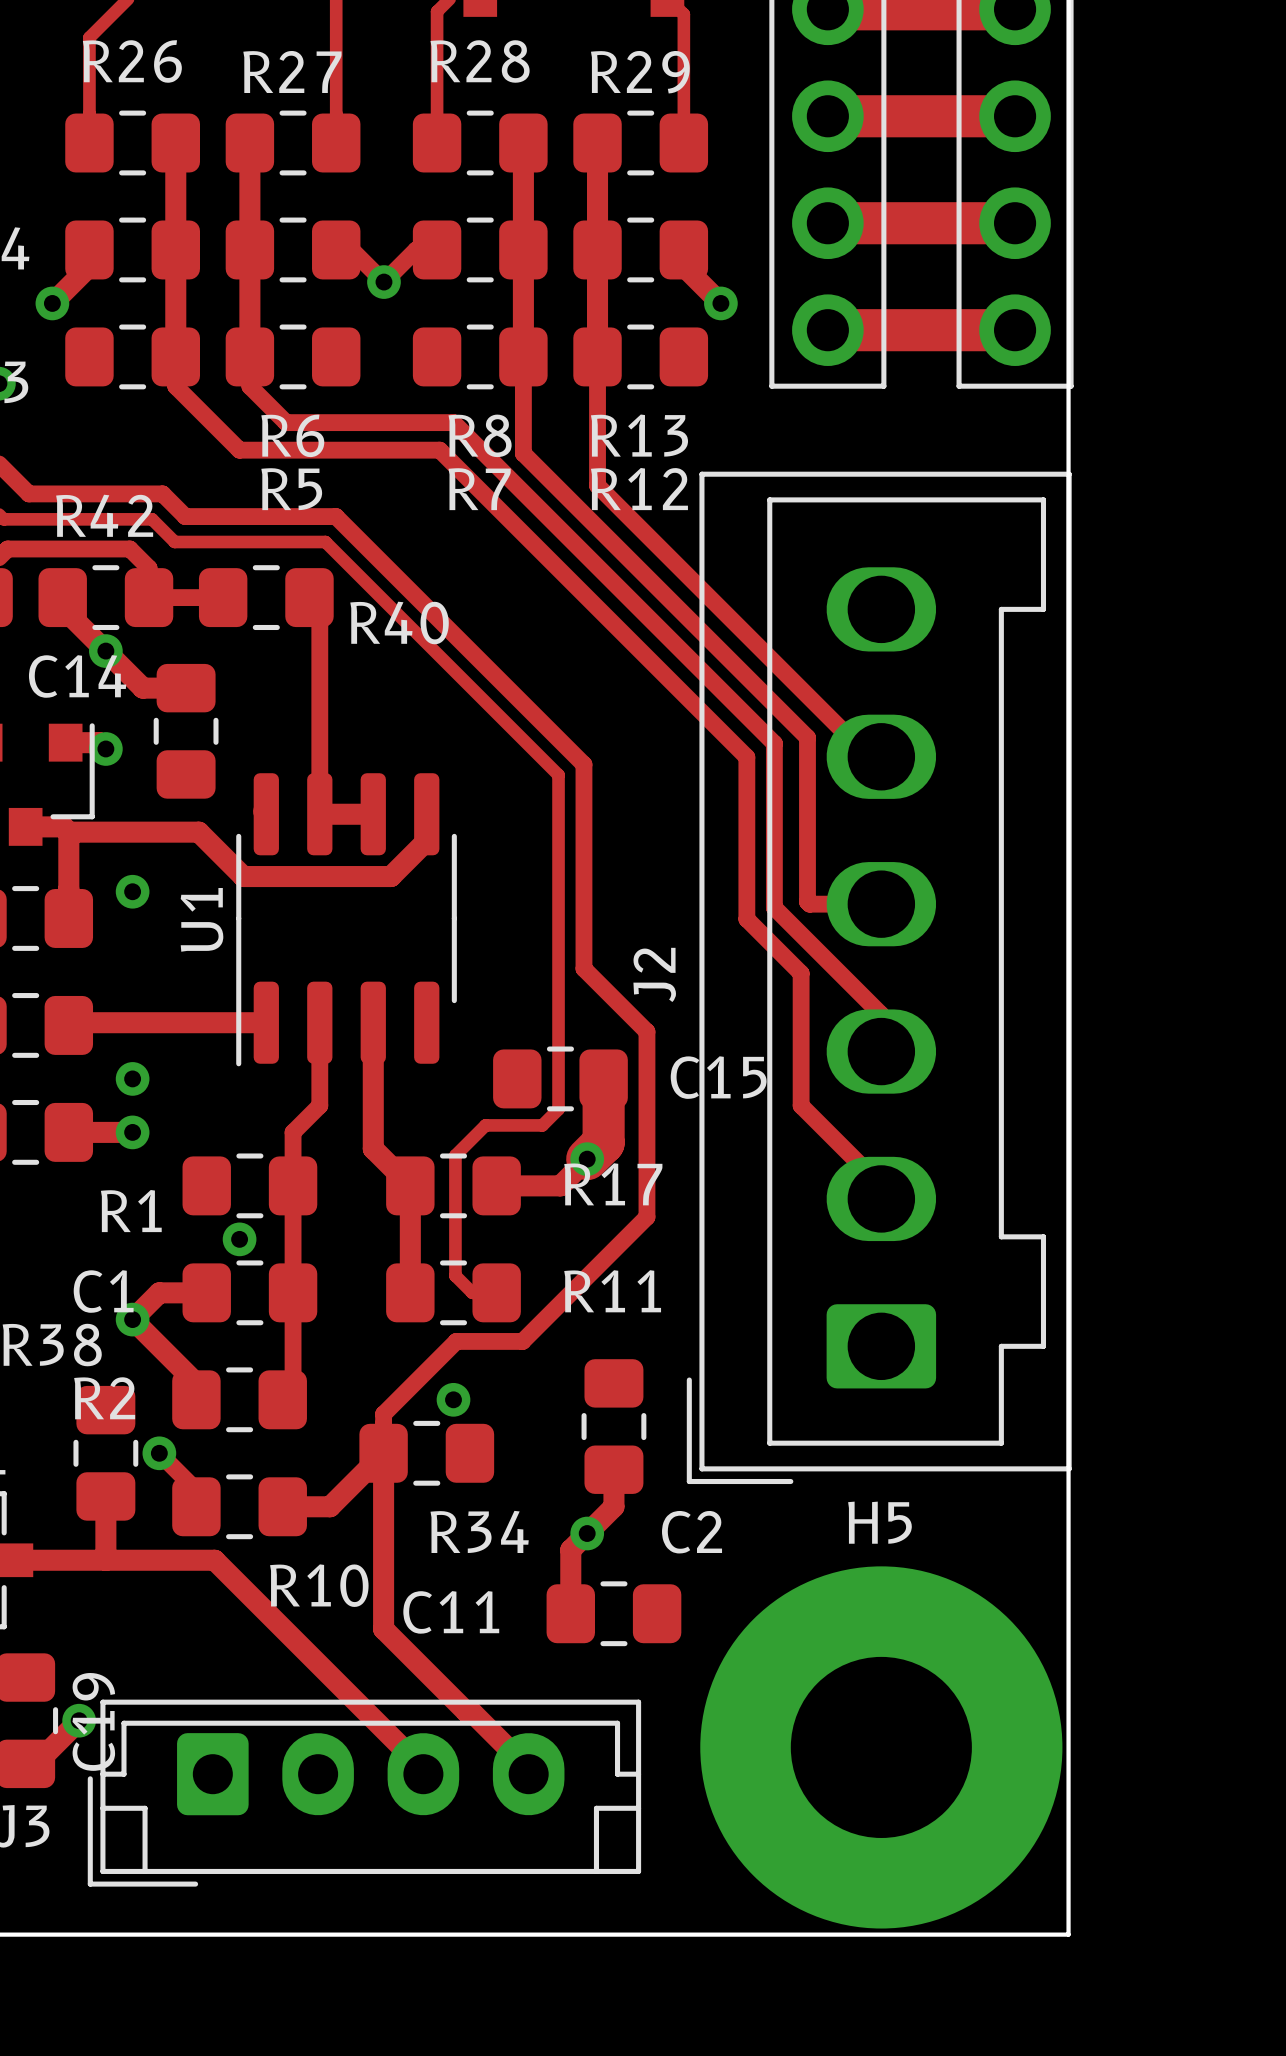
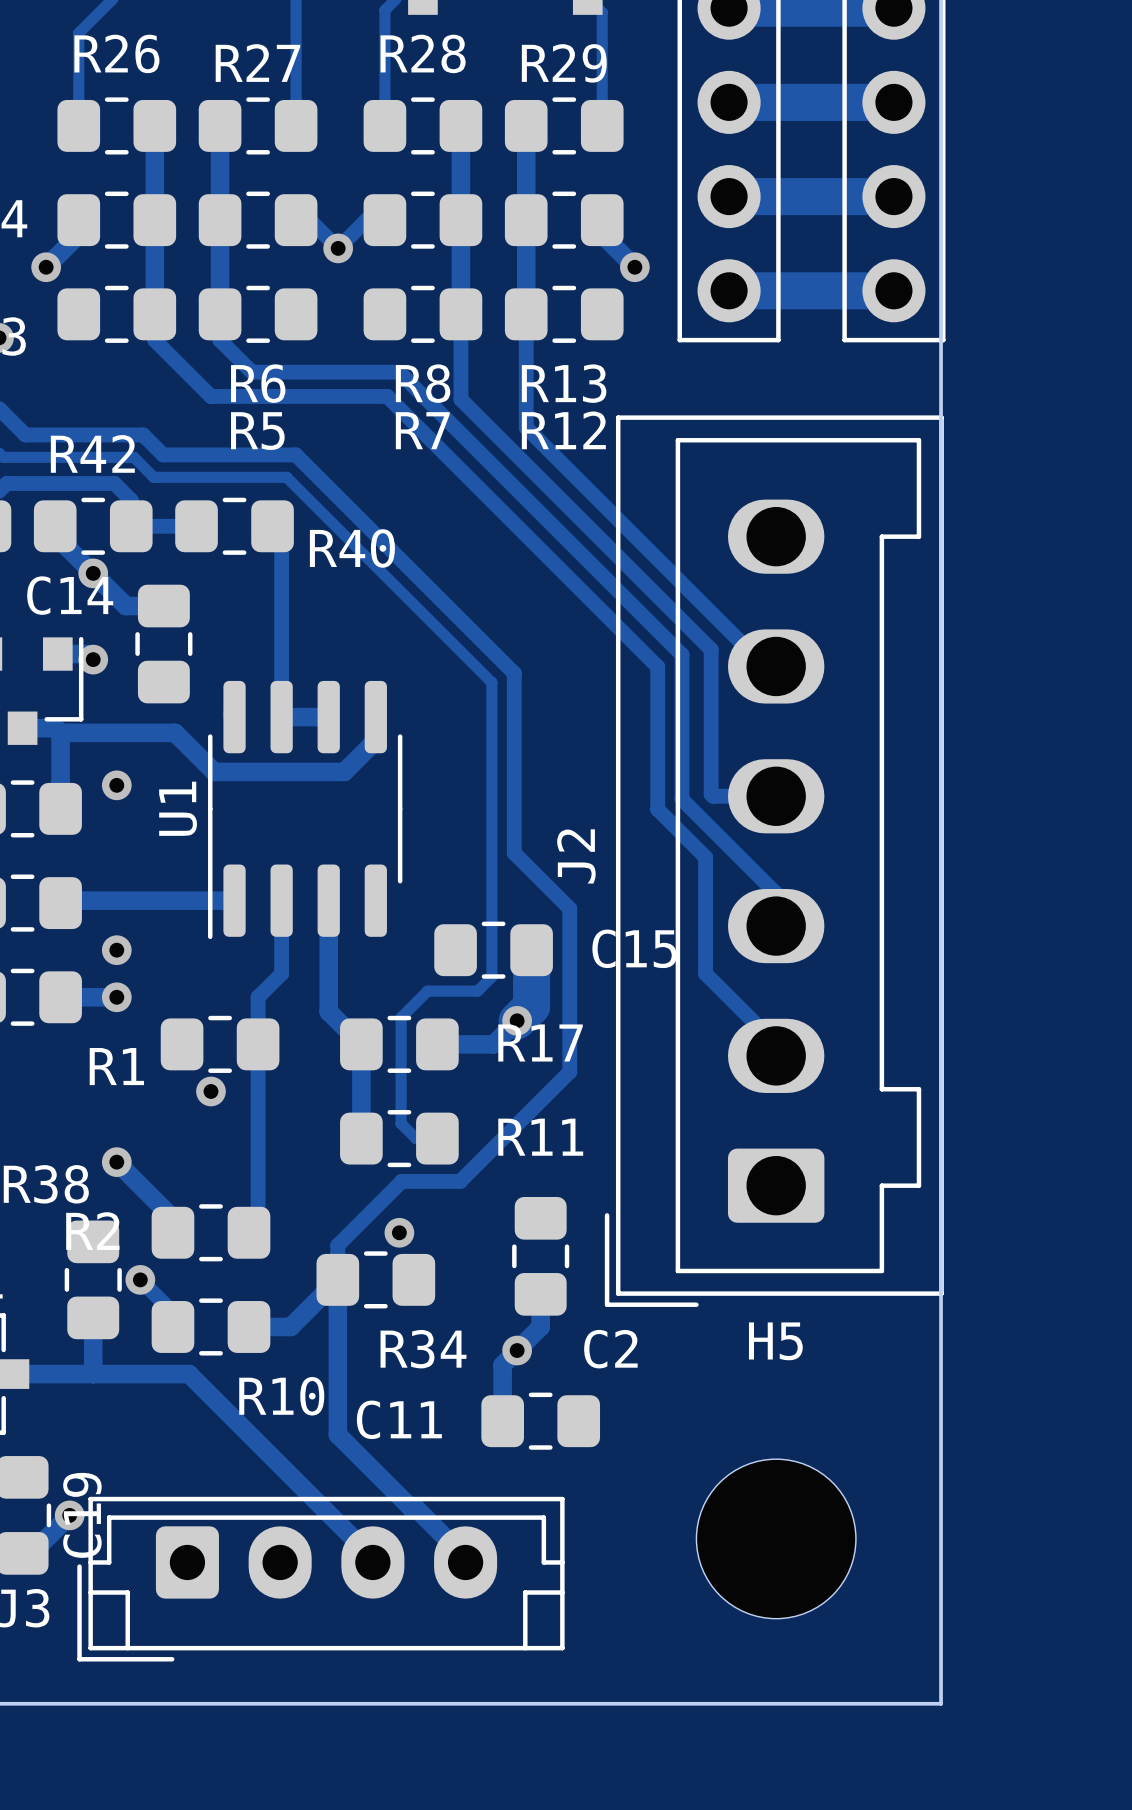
track: (206, 1292) (159, 1292) (132, 1319) -> none
C1: (249, 1292) -> none
H5 footprint: [700, 1566, 1063, 1929] -> [696, 1459, 856, 1619]

